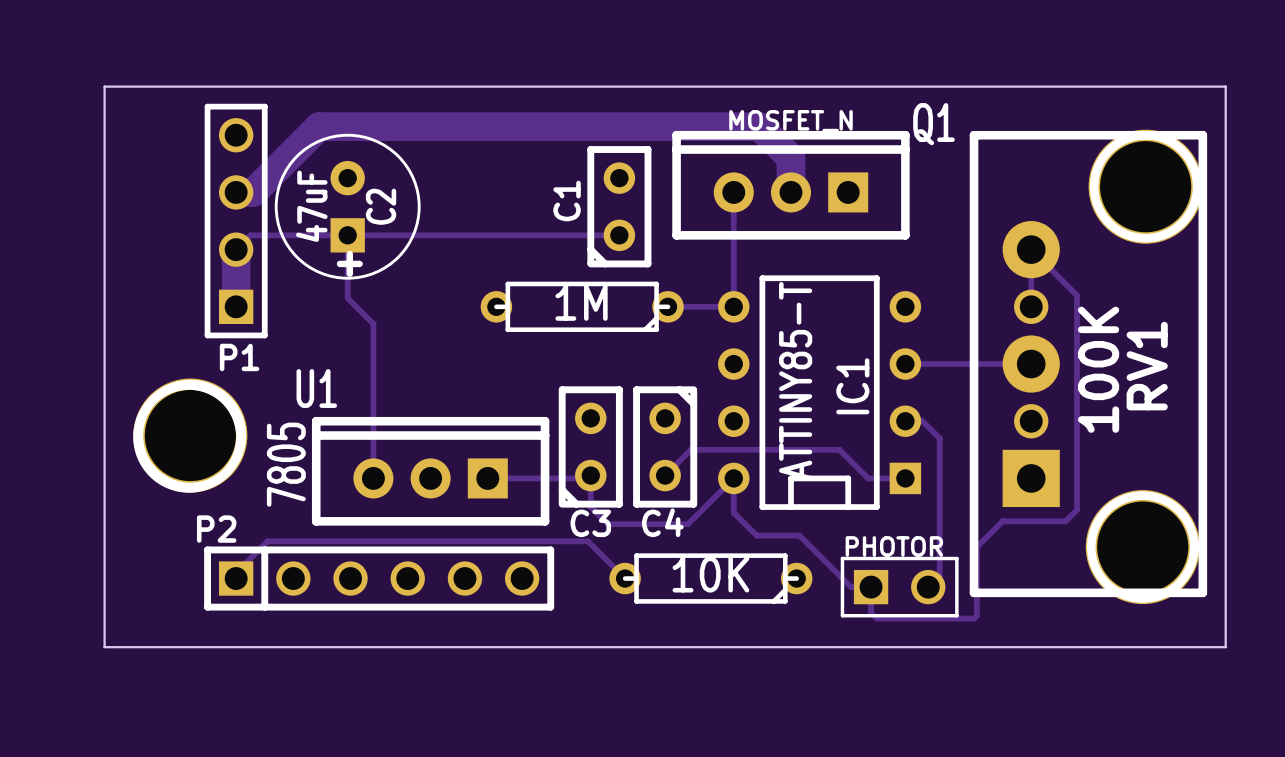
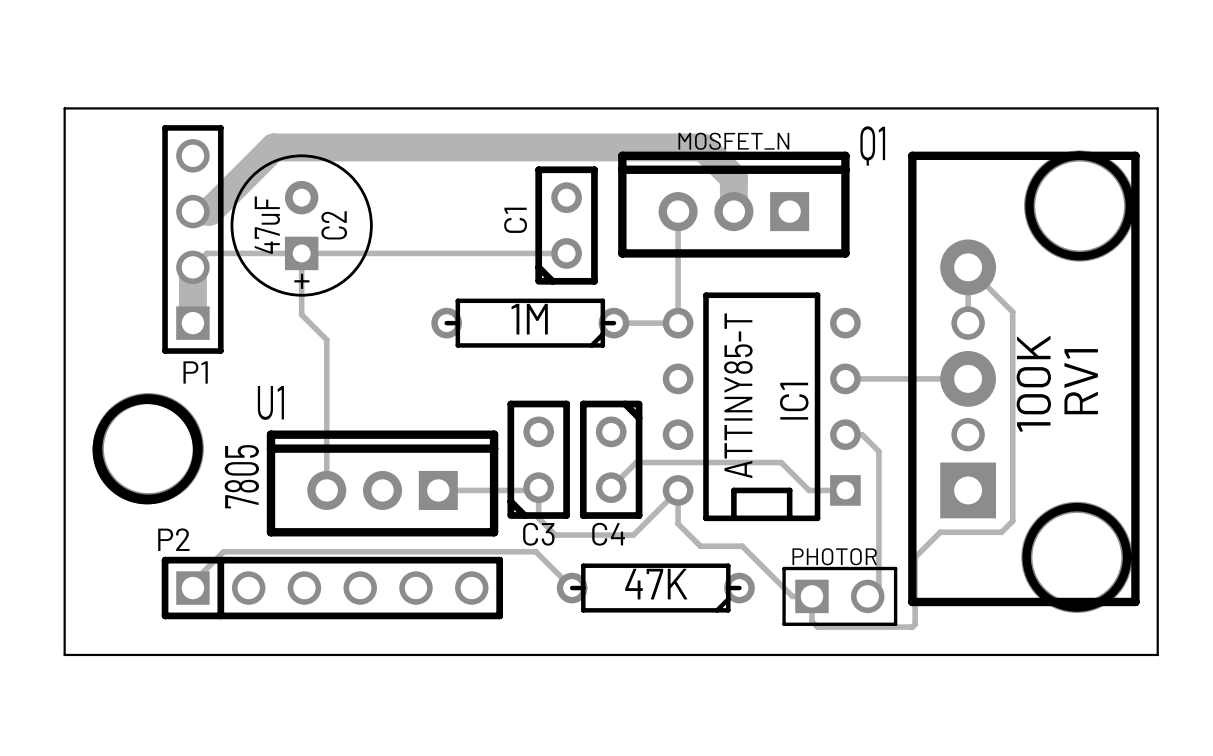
part value: 10K (710, 574) -> 47K (656, 584)

